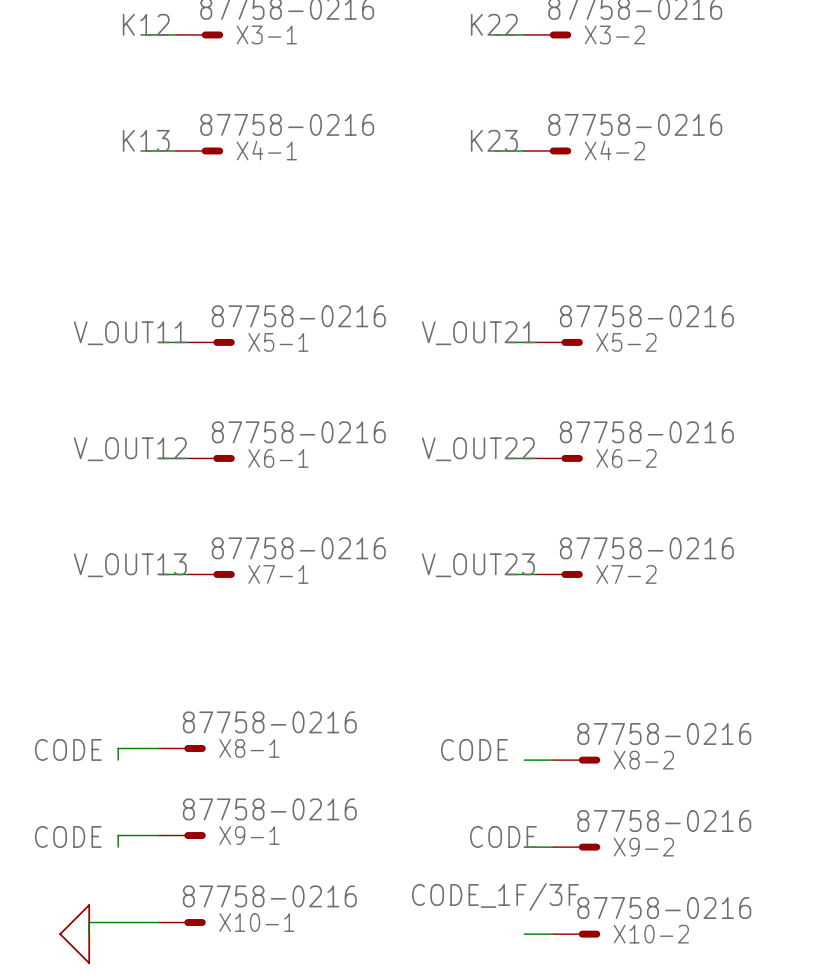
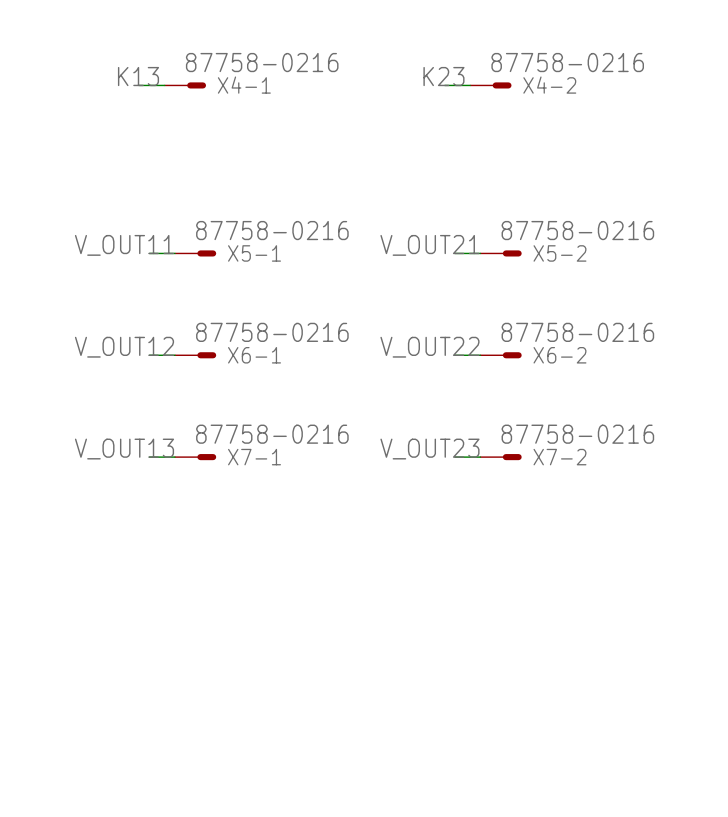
wire: (158, 748) (118, 748) (118, 760) -> none
X8-1: 87758-0216 (182, 748) -> none
label: CODE (68, 749) -> none
label: CODE (474, 749) -> none
wire: (524, 760) (553, 760) -> none
X8-2: 87758-0216 (576, 760) -> none
wire: (158, 835) (118, 835) (118, 847) -> none
X9-1: 87758-0216 (182, 835) -> none
label: CODE (68, 836) -> none
label: CODE (503, 836) -> none
wire: (524, 847) (553, 847) -> none
X9-2: 87758-0216 (576, 847) -> none
label: CODE_1F/3F (495, 896) -> none
wire: (158, 922) (89, 922) (89, 934) -> none
X10-1: 87758-0216 (182, 922) -> none
power symbol: (74, 934) -> none
wire: (524, 934) (553, 934) -> none
X10-2: 87758-0216 (576, 934) -> none

